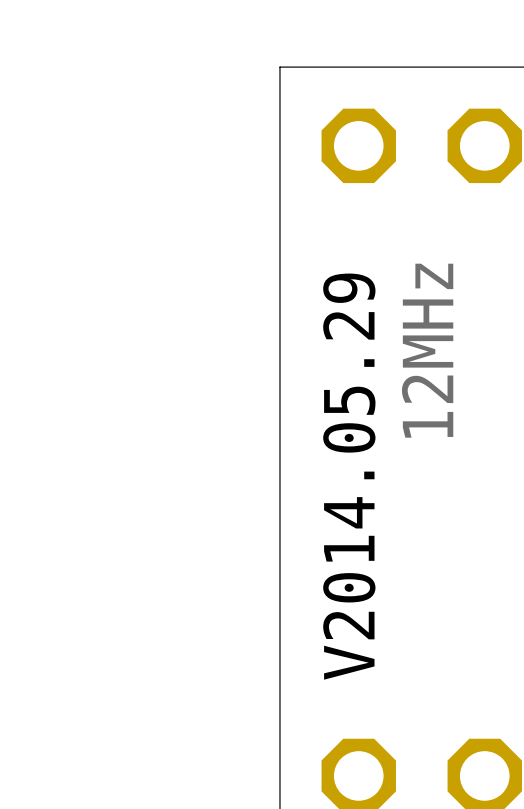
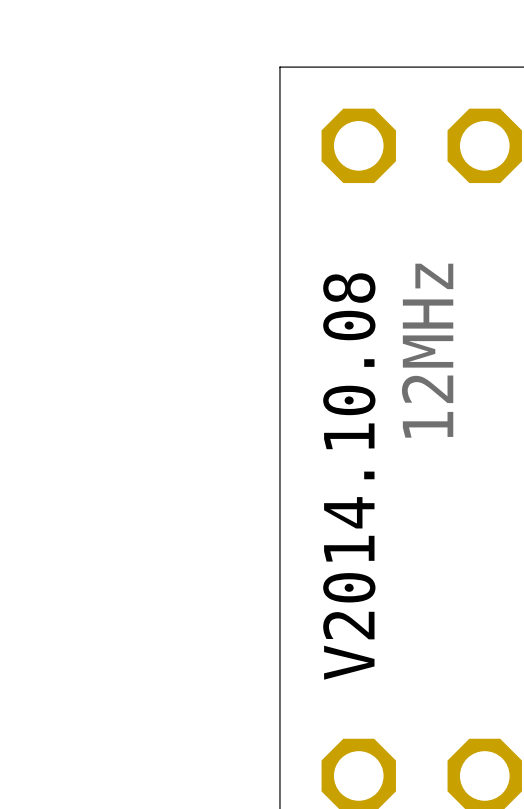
text: V2014.05.29 (349, 476) -> V2014.10.08 (349, 476)

